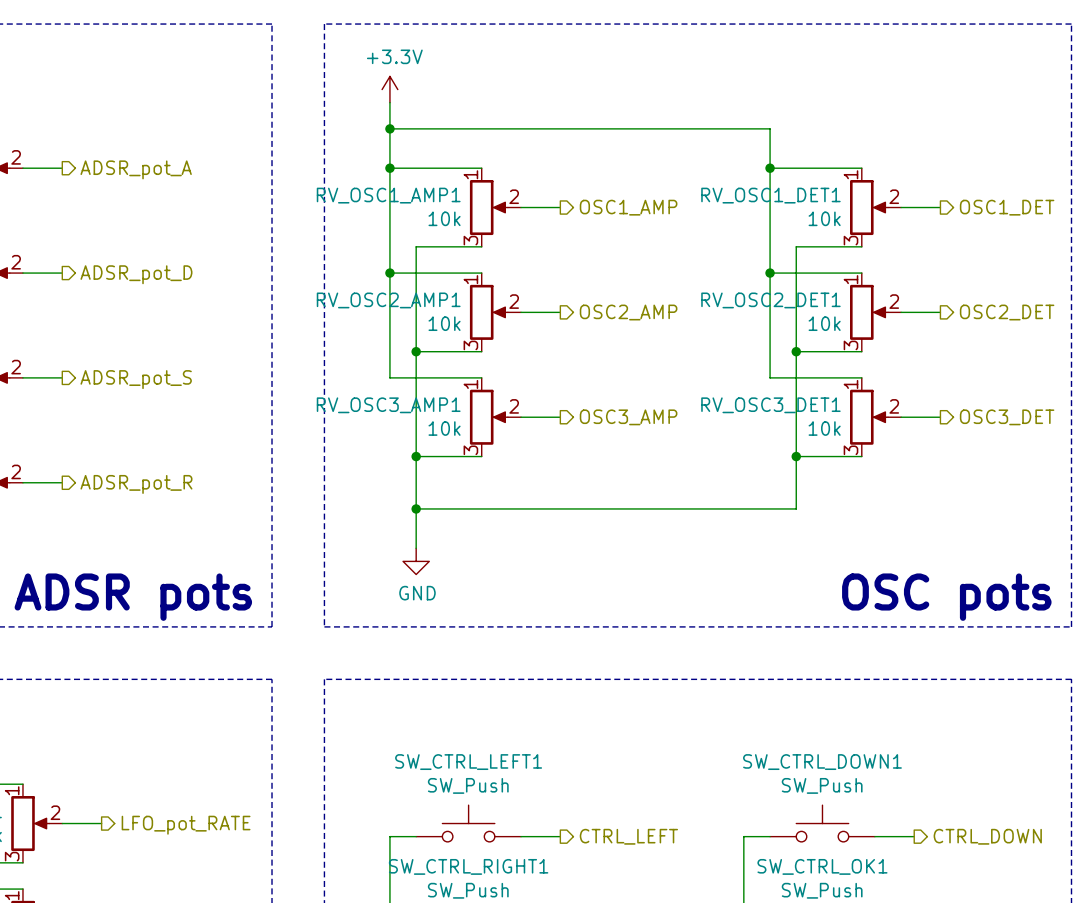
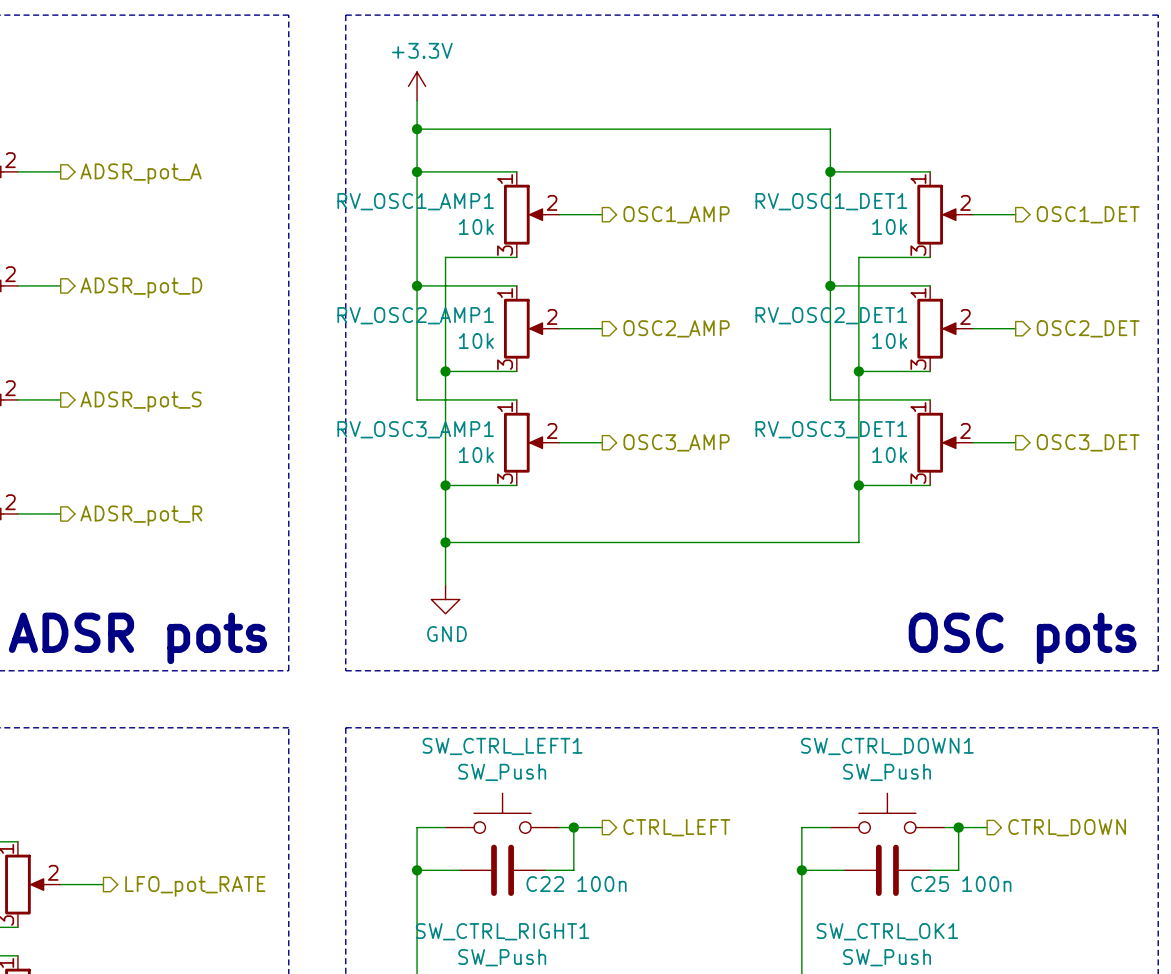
wire: none -> (573, 827) (573, 870) (545, 870)
junction: none -> (573, 827)
wire: none -> (958, 827) (958, 870) (930, 870)
junction: none -> (958, 827)
wire: none -> (417, 870) (459, 870)
junction: none -> (417, 870)
C22: none -> 100n (502, 870)
wire: none -> (801, 870) (844, 870)
junction: none -> (801, 870)
C25: none -> 100n (887, 870)
SW_CTRL_LEFT1 position: (468, 823) -> (502, 813)
SW_CTRL_DOWN1 position: (822, 823) -> (887, 813)
wire: (389, 836) (416, 836) -> (417, 898) (417, 827) (445, 827)
wire: (521, 836) (560, 836) -> (559, 827) (602, 827)
hierarchical label position: CTRL_LEFT (628, 836) -> CTRL_LEFT (676, 827)
wire: (743, 836) (770, 836) -> (801, 898) (801, 827) (830, 827)
wire: (874, 836) (914, 836) -> (944, 827) (987, 827)
hierarchical label position: CTRL_DOWN (987, 836) -> CTRL_DOWN (1067, 827)

